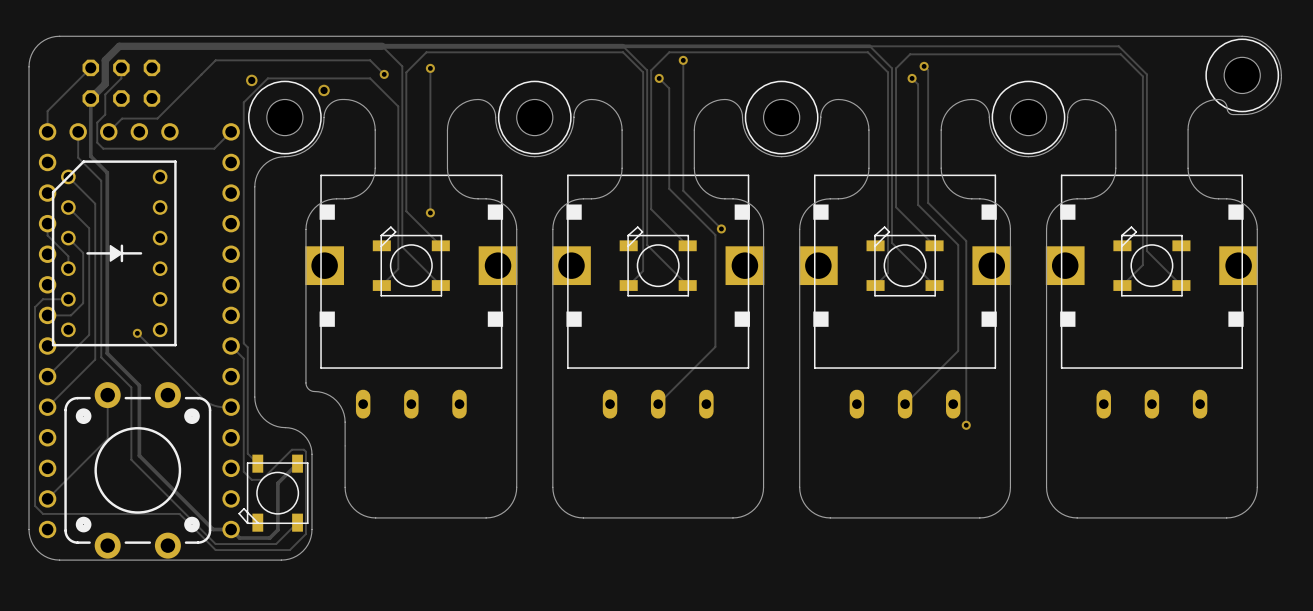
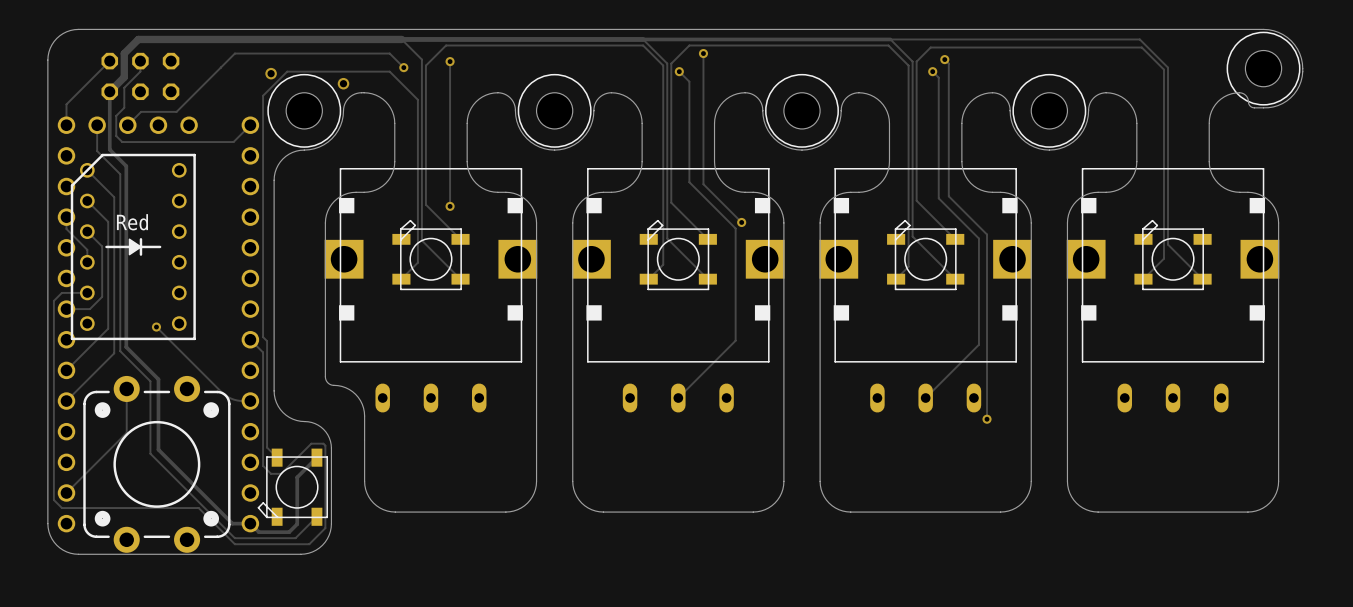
part value: none -> Red (132, 222)

